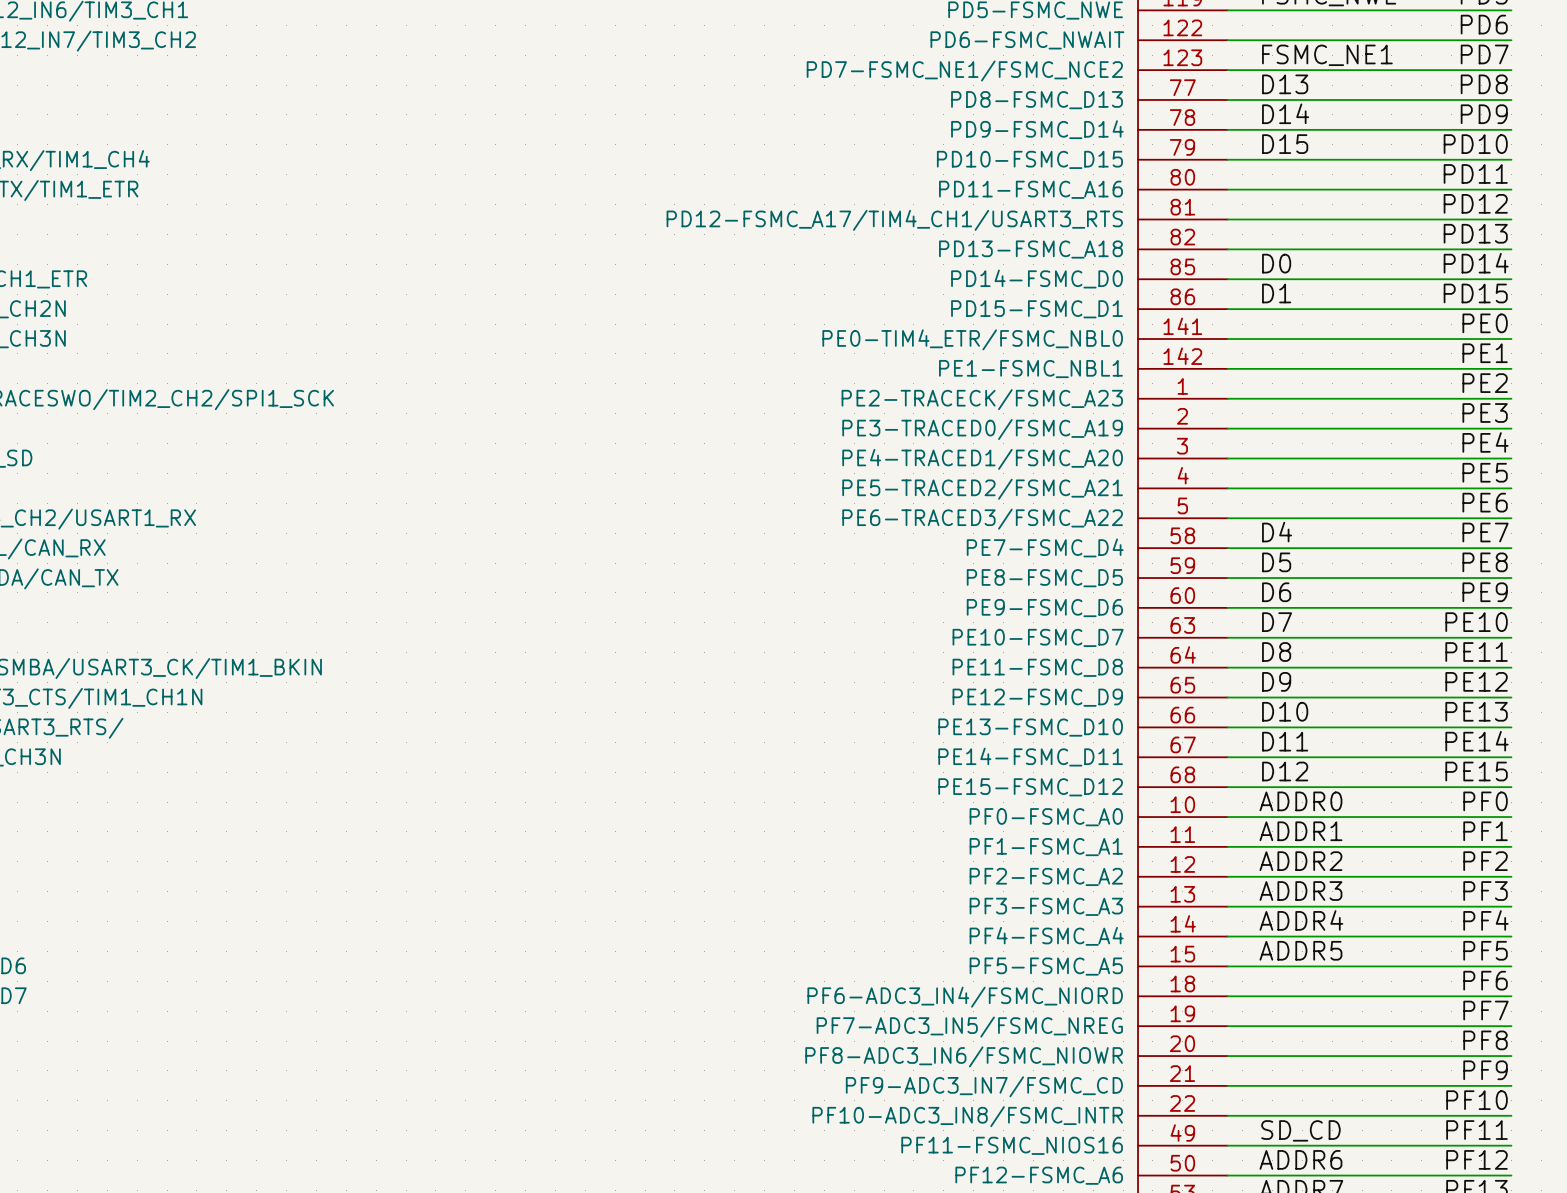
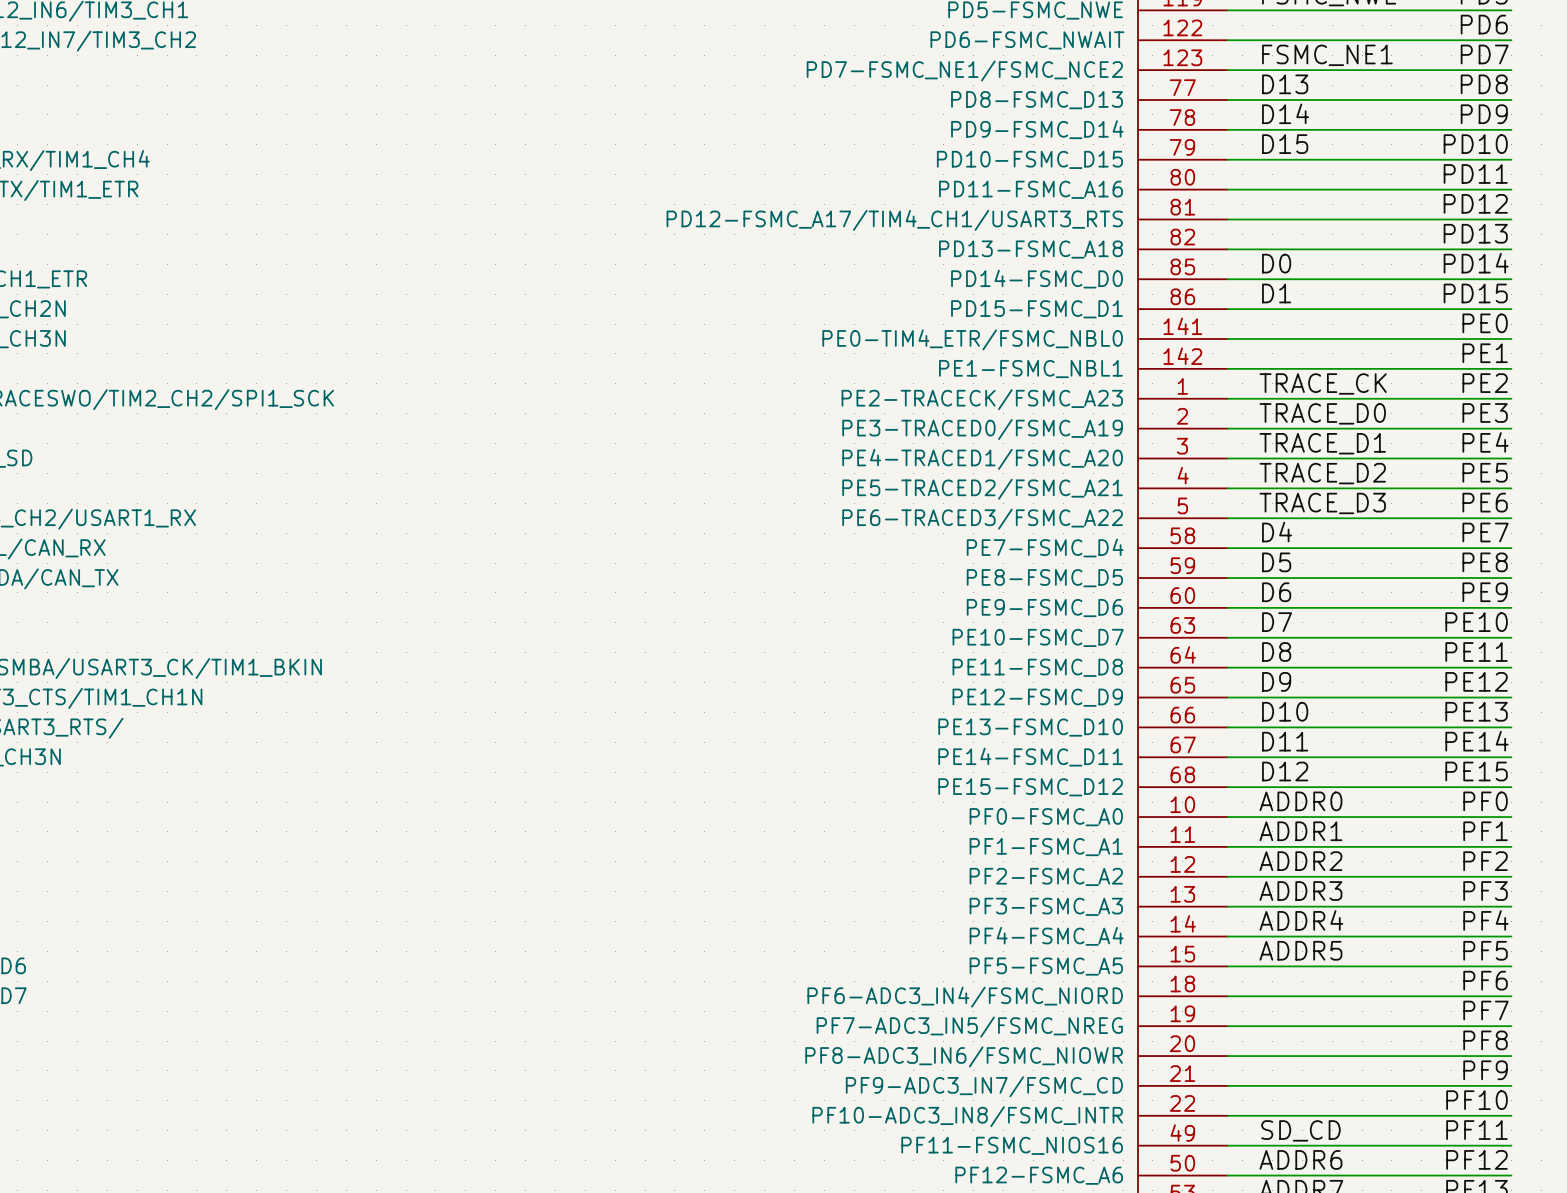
label: none -> TRACE_CK (1323, 383)
label: none -> TRACE_D0 (1322, 413)
label: none -> TRACE_D1 (1322, 443)
label: none -> TRACE_D2 (1322, 473)
label: none -> TRACE_D3 (1322, 503)

